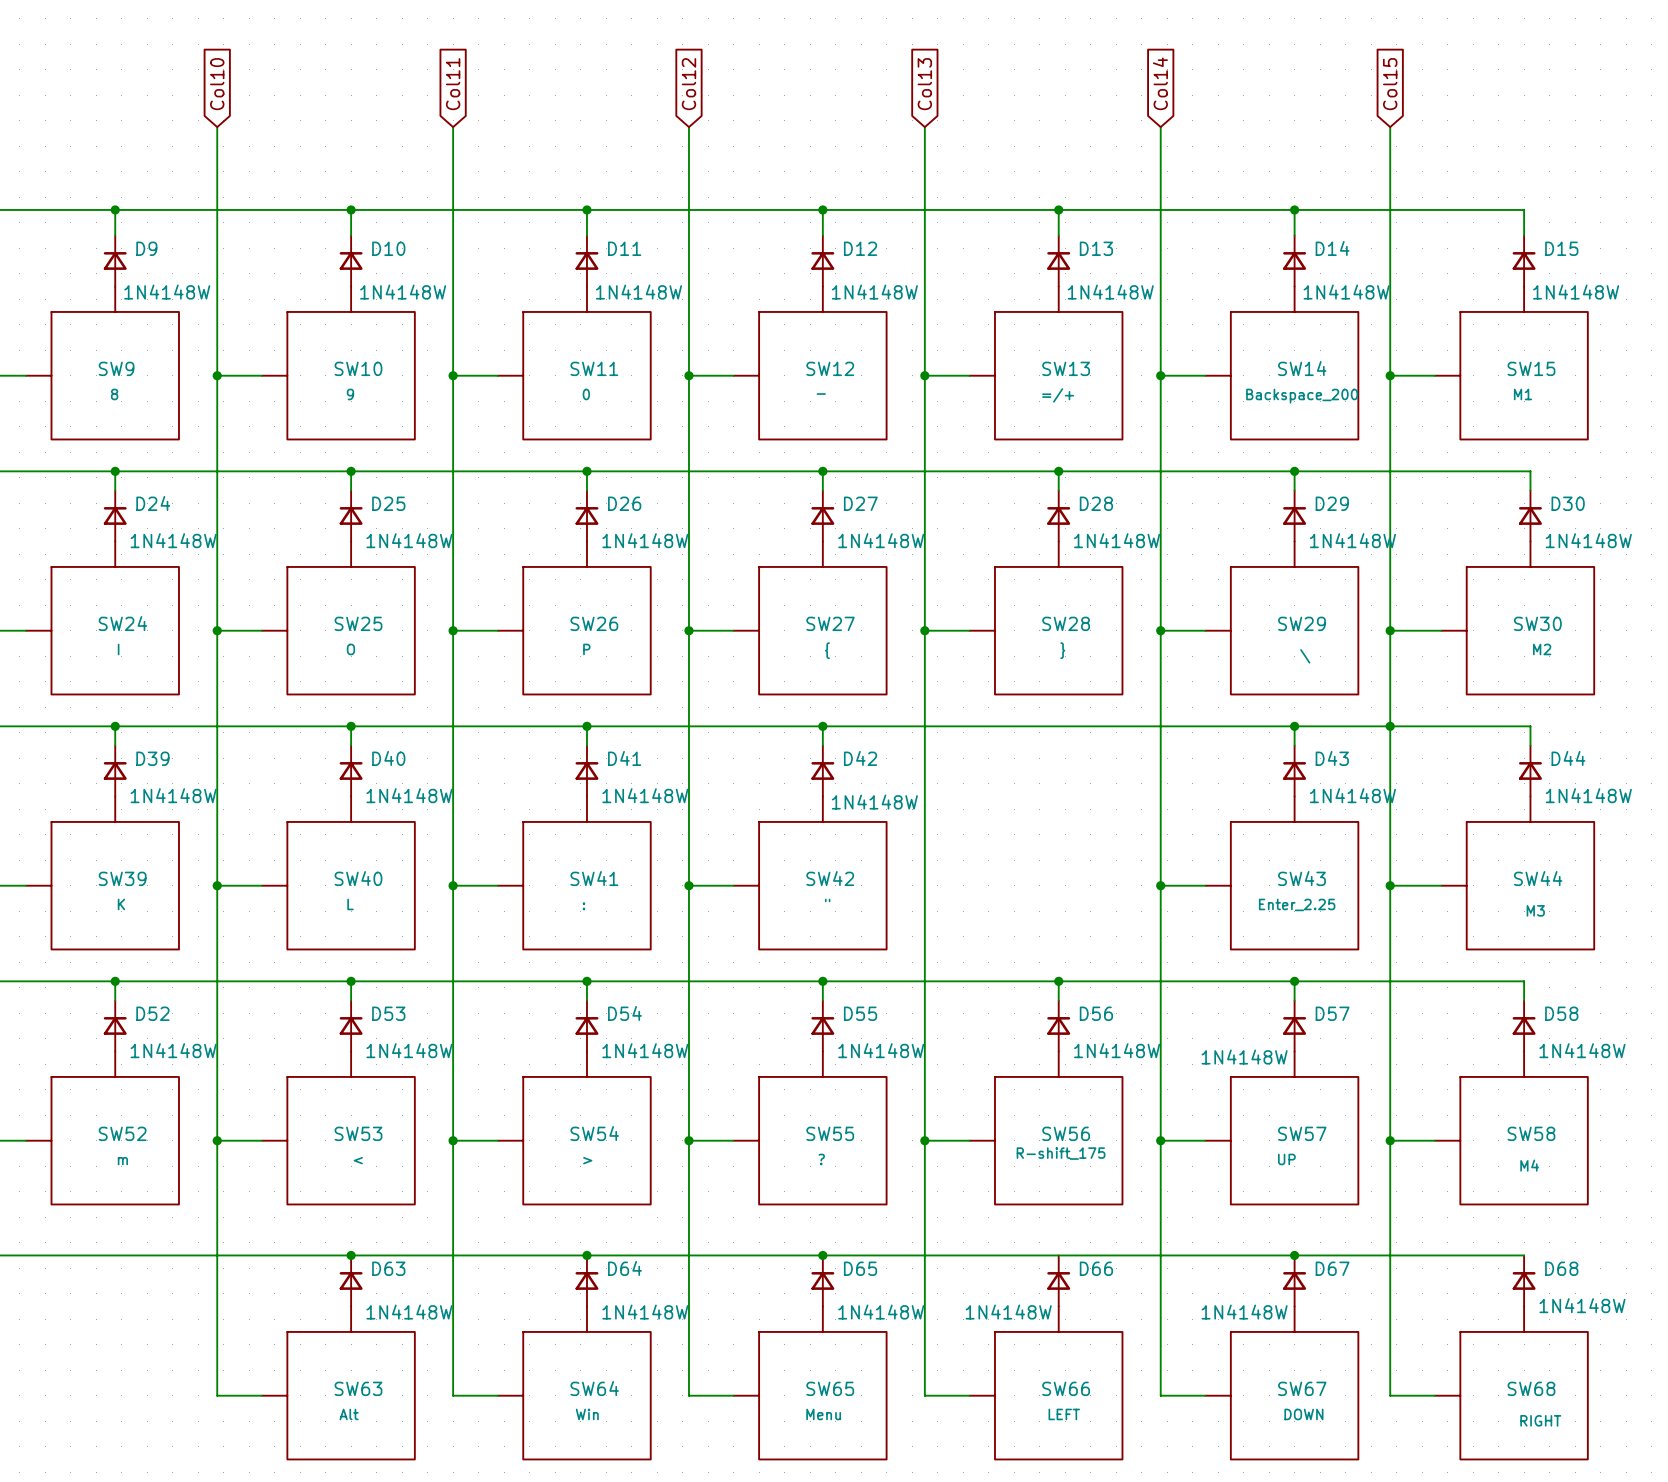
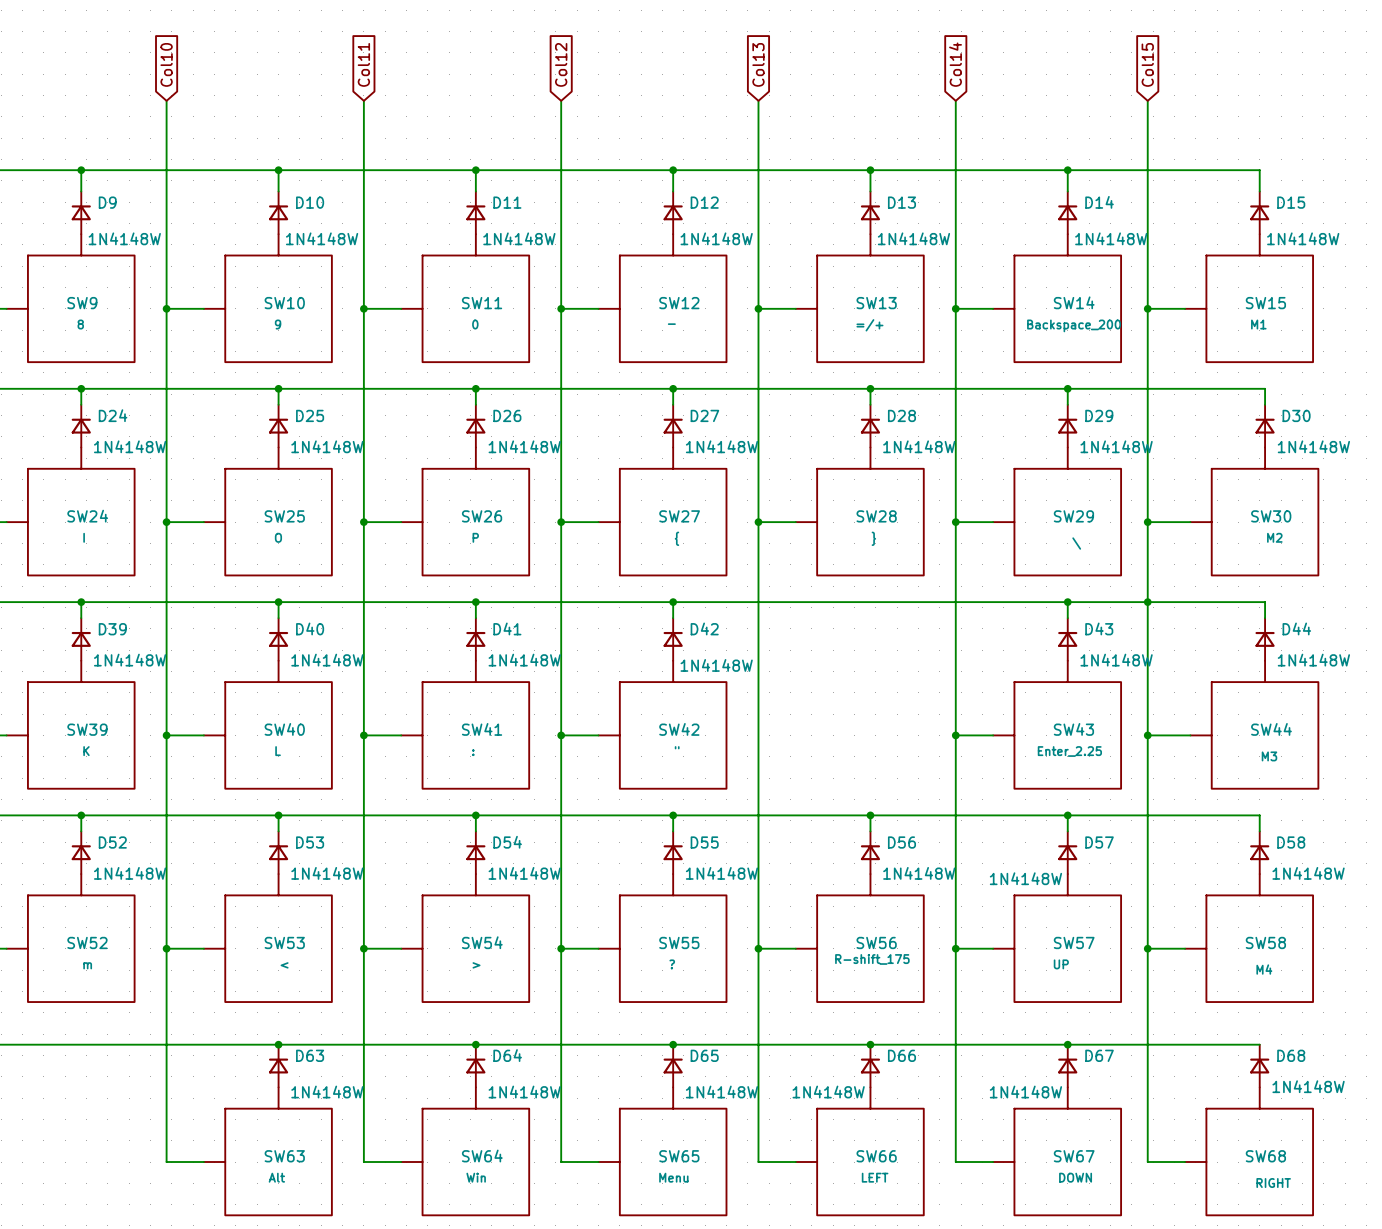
junction: none -> (870, 1044)

